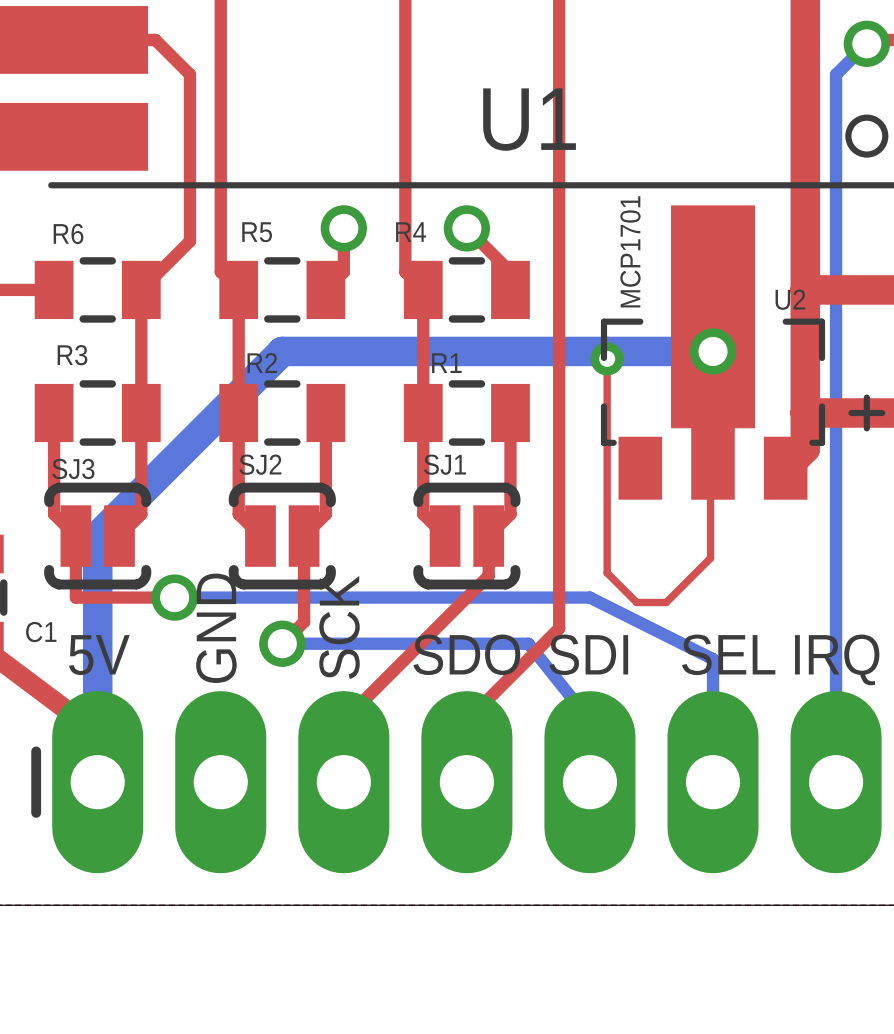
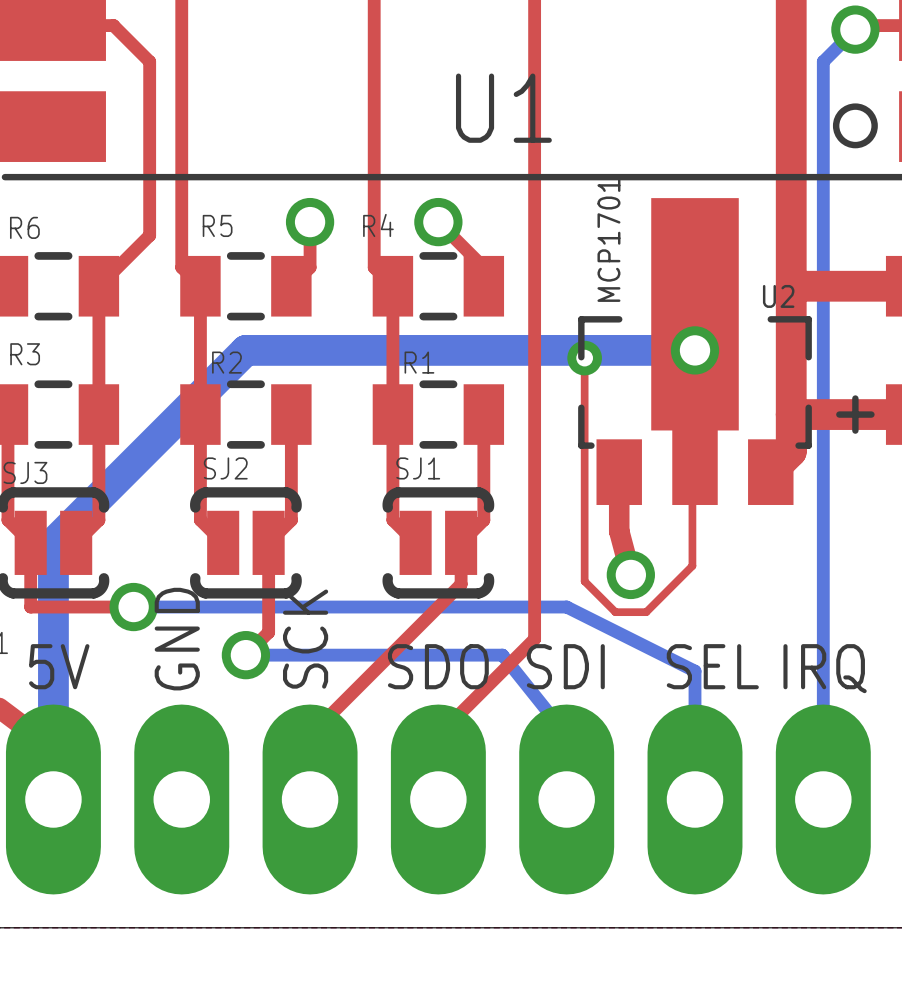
top track: none -> (619, 472) (619, 531) (630, 574)
via: none -> (630, 574)

